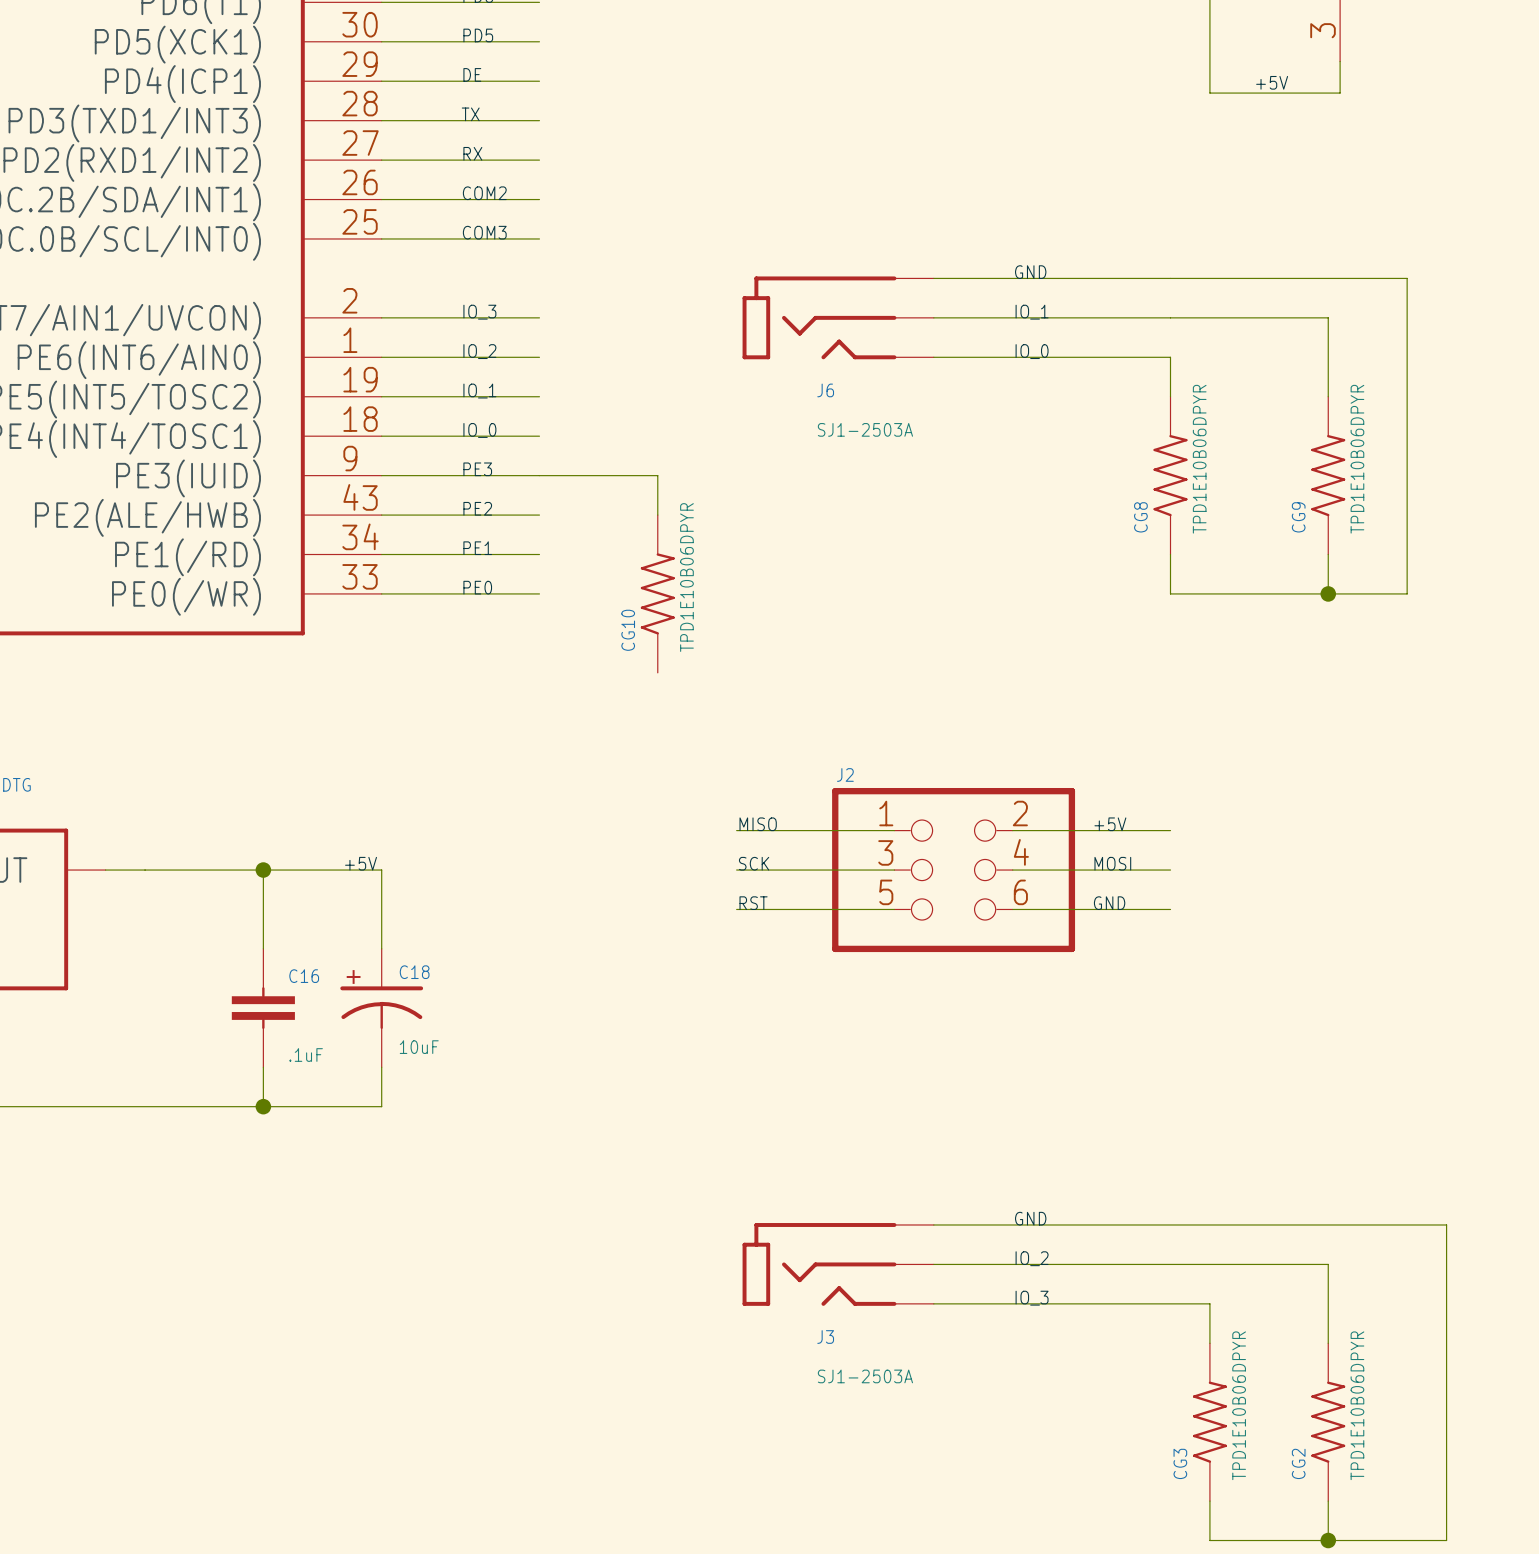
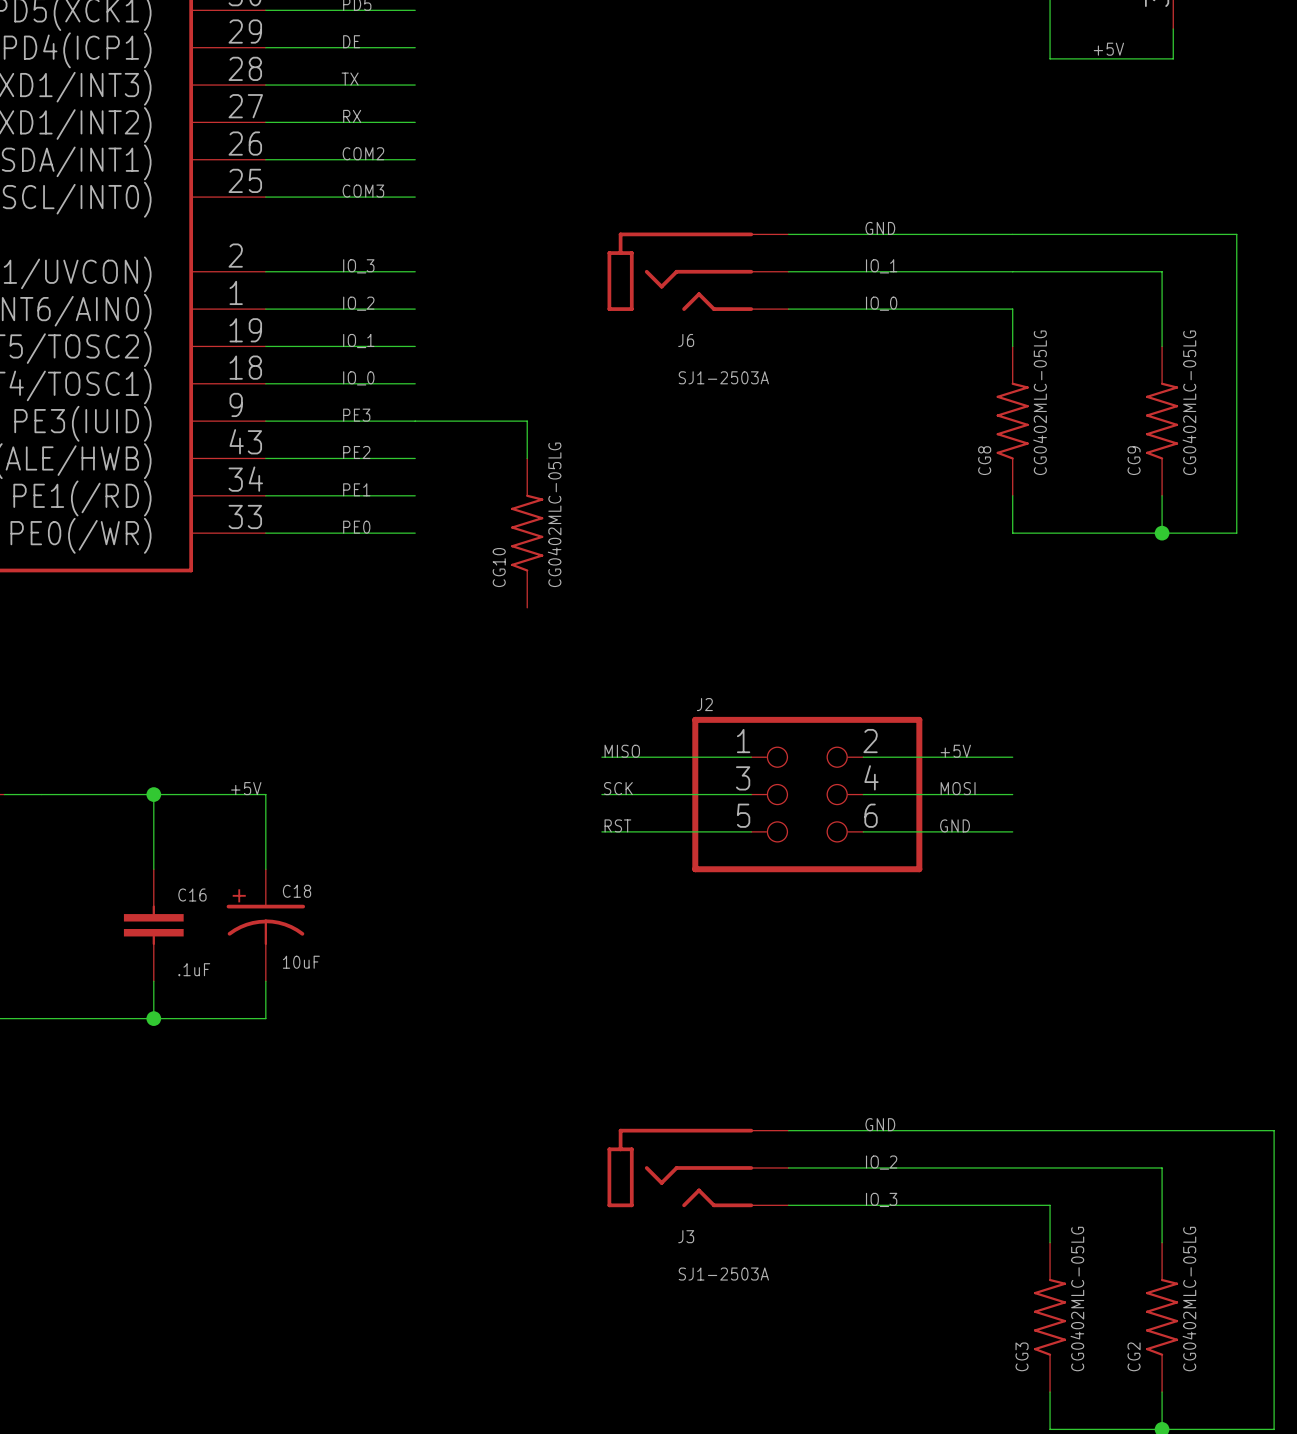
CG8 value: TPD1E10B06DPYR (1199, 459) -> CG0402MLC-05LG (1040, 402)
CG9 value: TPD1E10B06DPYR (1357, 459) -> CG0402MLC-05LG (1189, 402)
CG10 value: TPD1E10B06DPYR (686, 577) -> CG0402MLC-05LG (554, 514)
CG3 value: TPD1E10B06DPYR (1239, 1405) -> CG0402MLC-05LG (1077, 1299)
CG2 value: TPD1E10B06DPYR (1357, 1405) -> CG0402MLC-05LG (1189, 1299)

